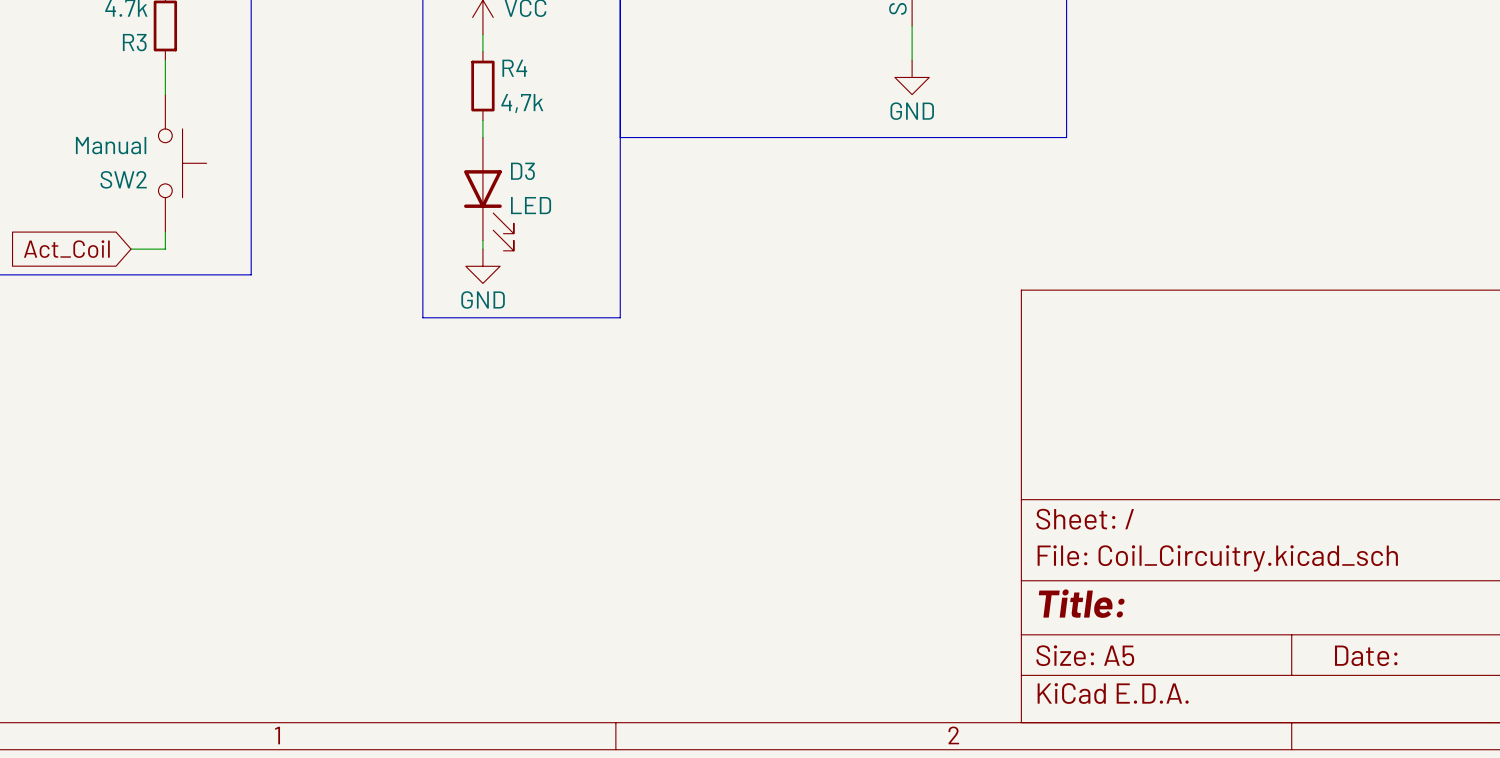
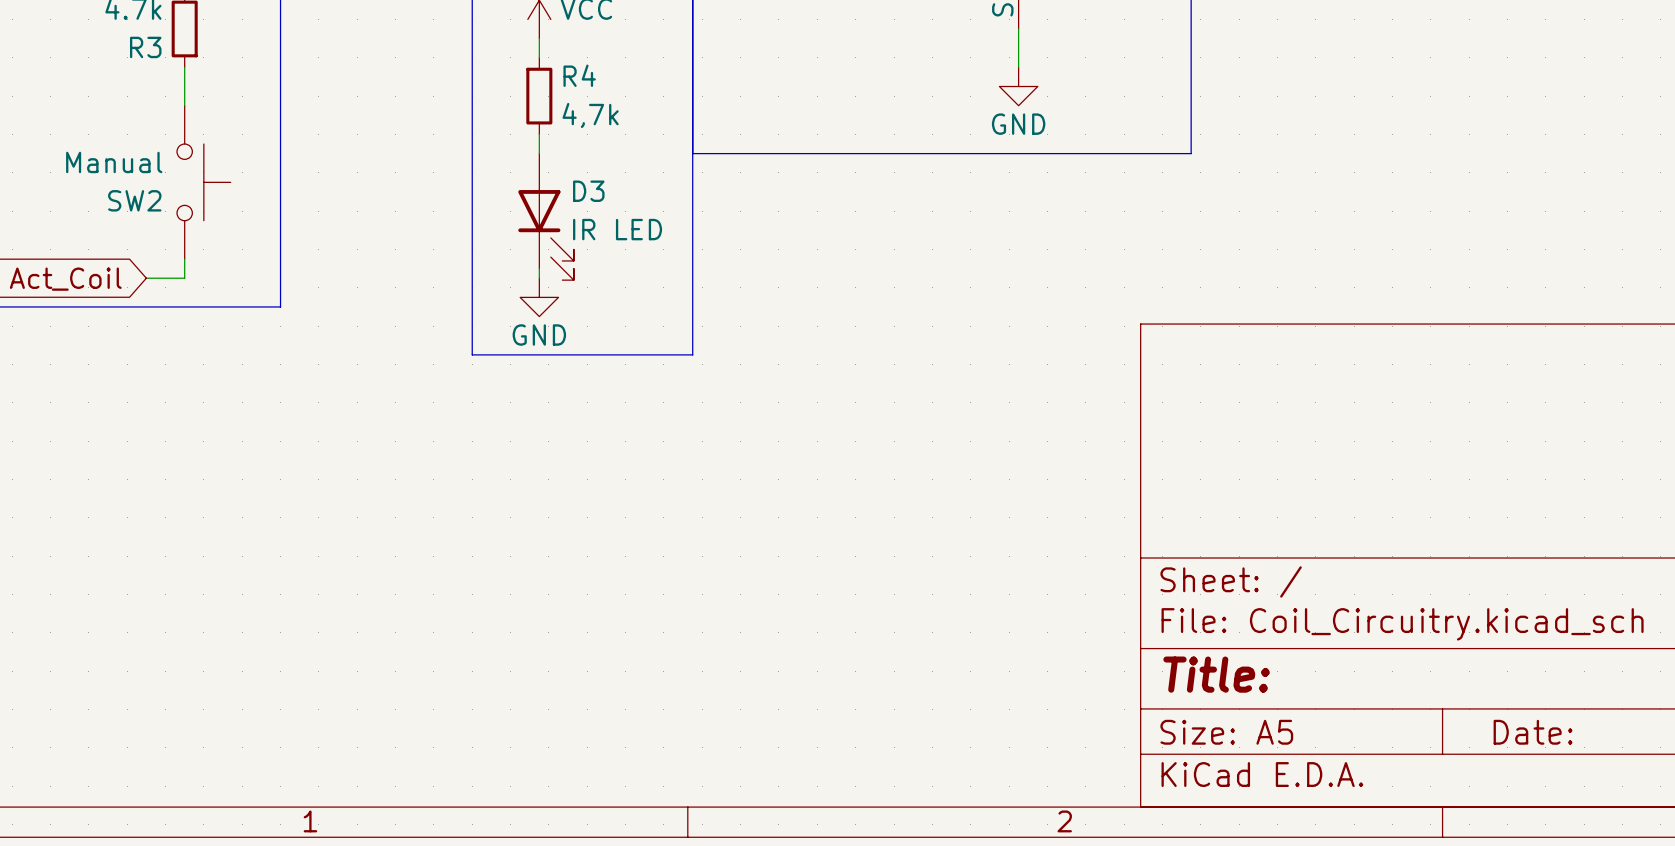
D3 value: LED (531, 205) -> IR LED (617, 229)

